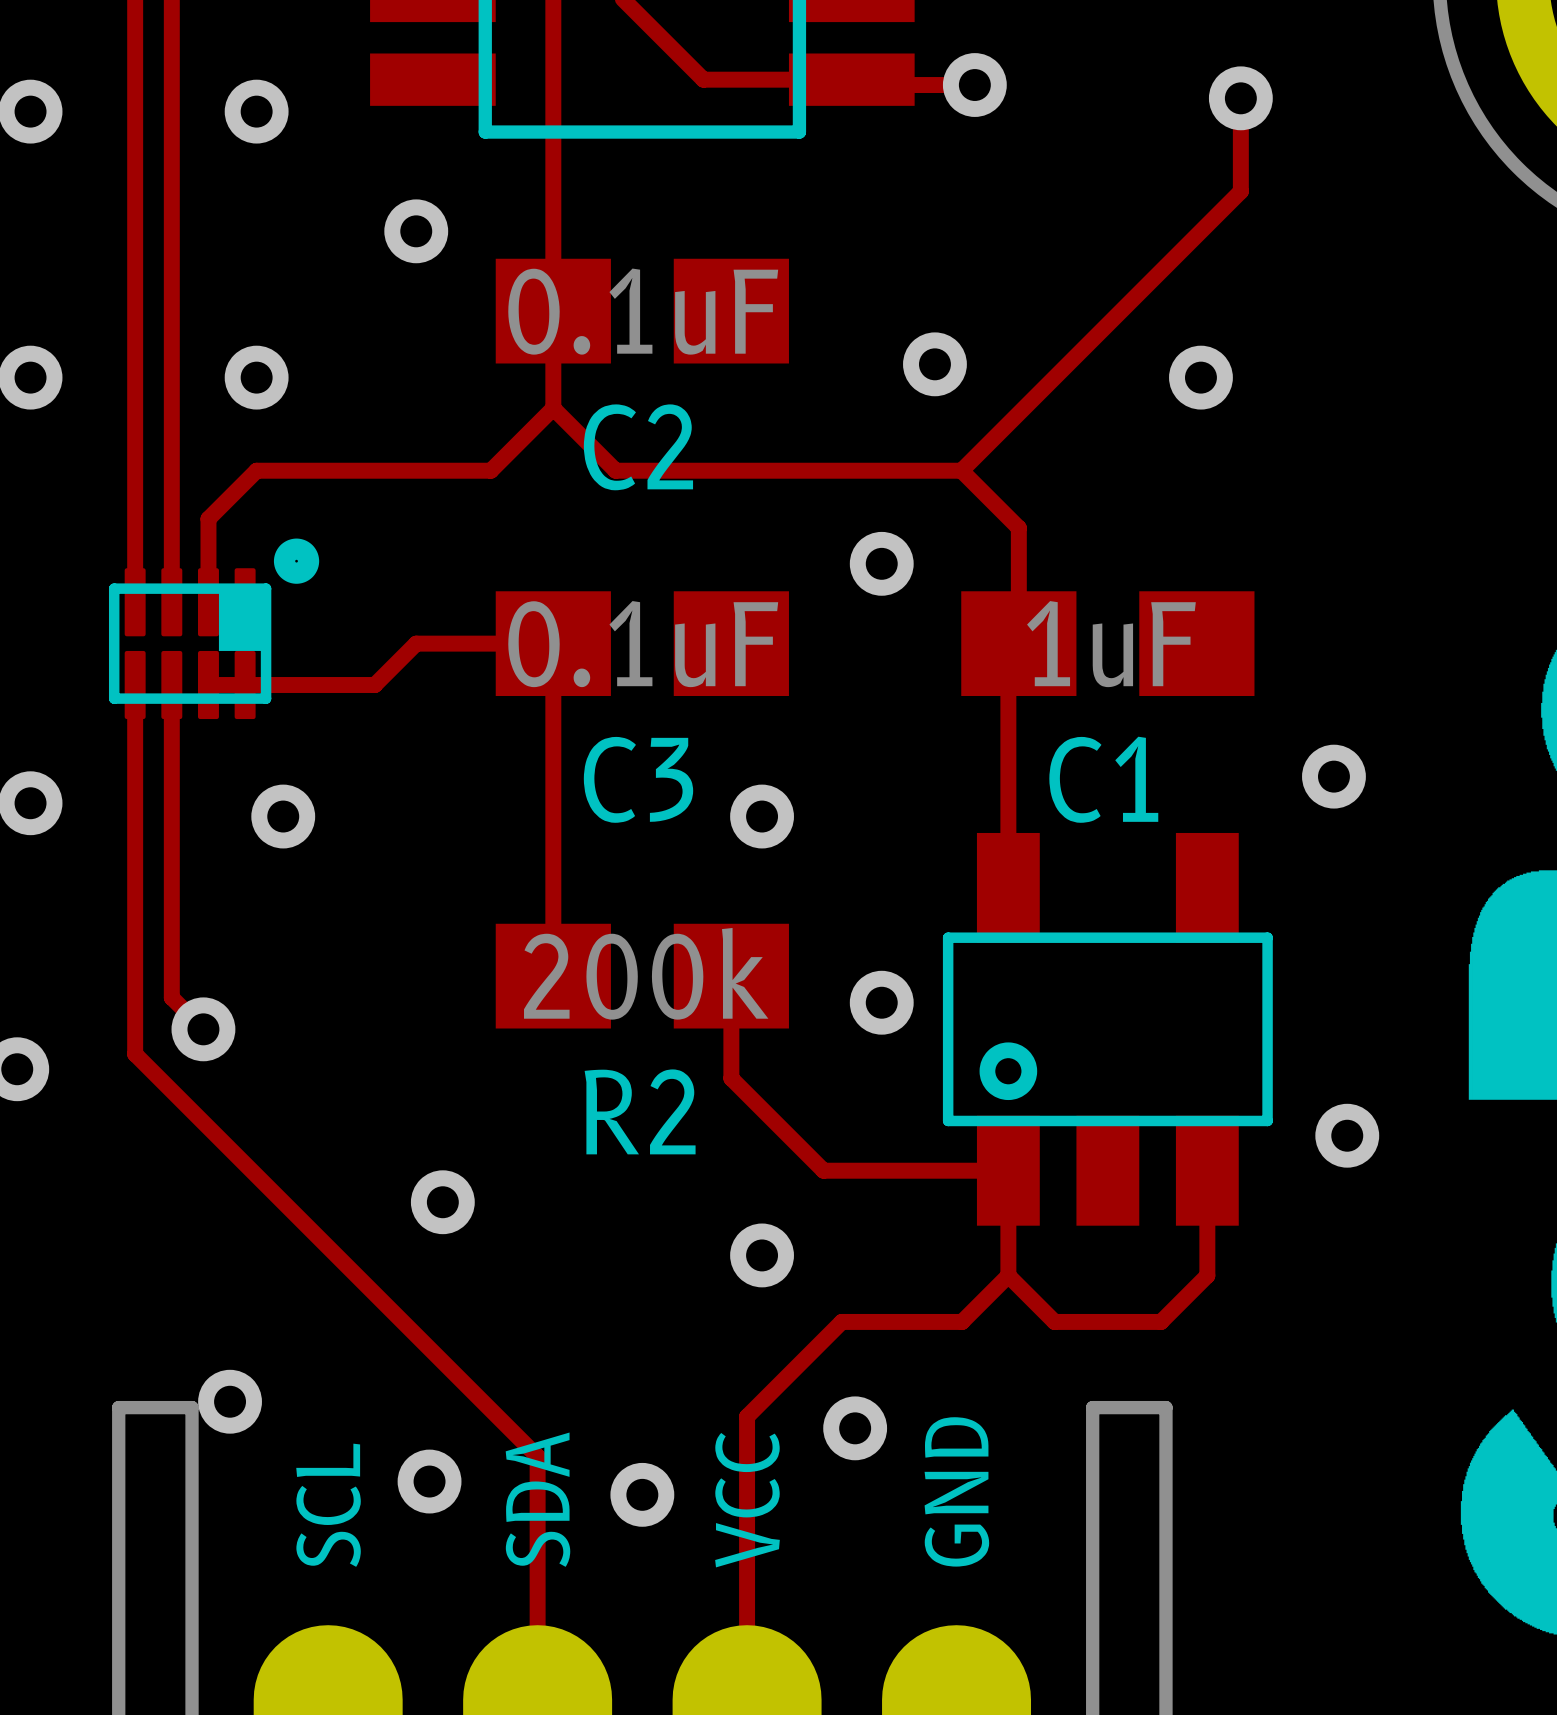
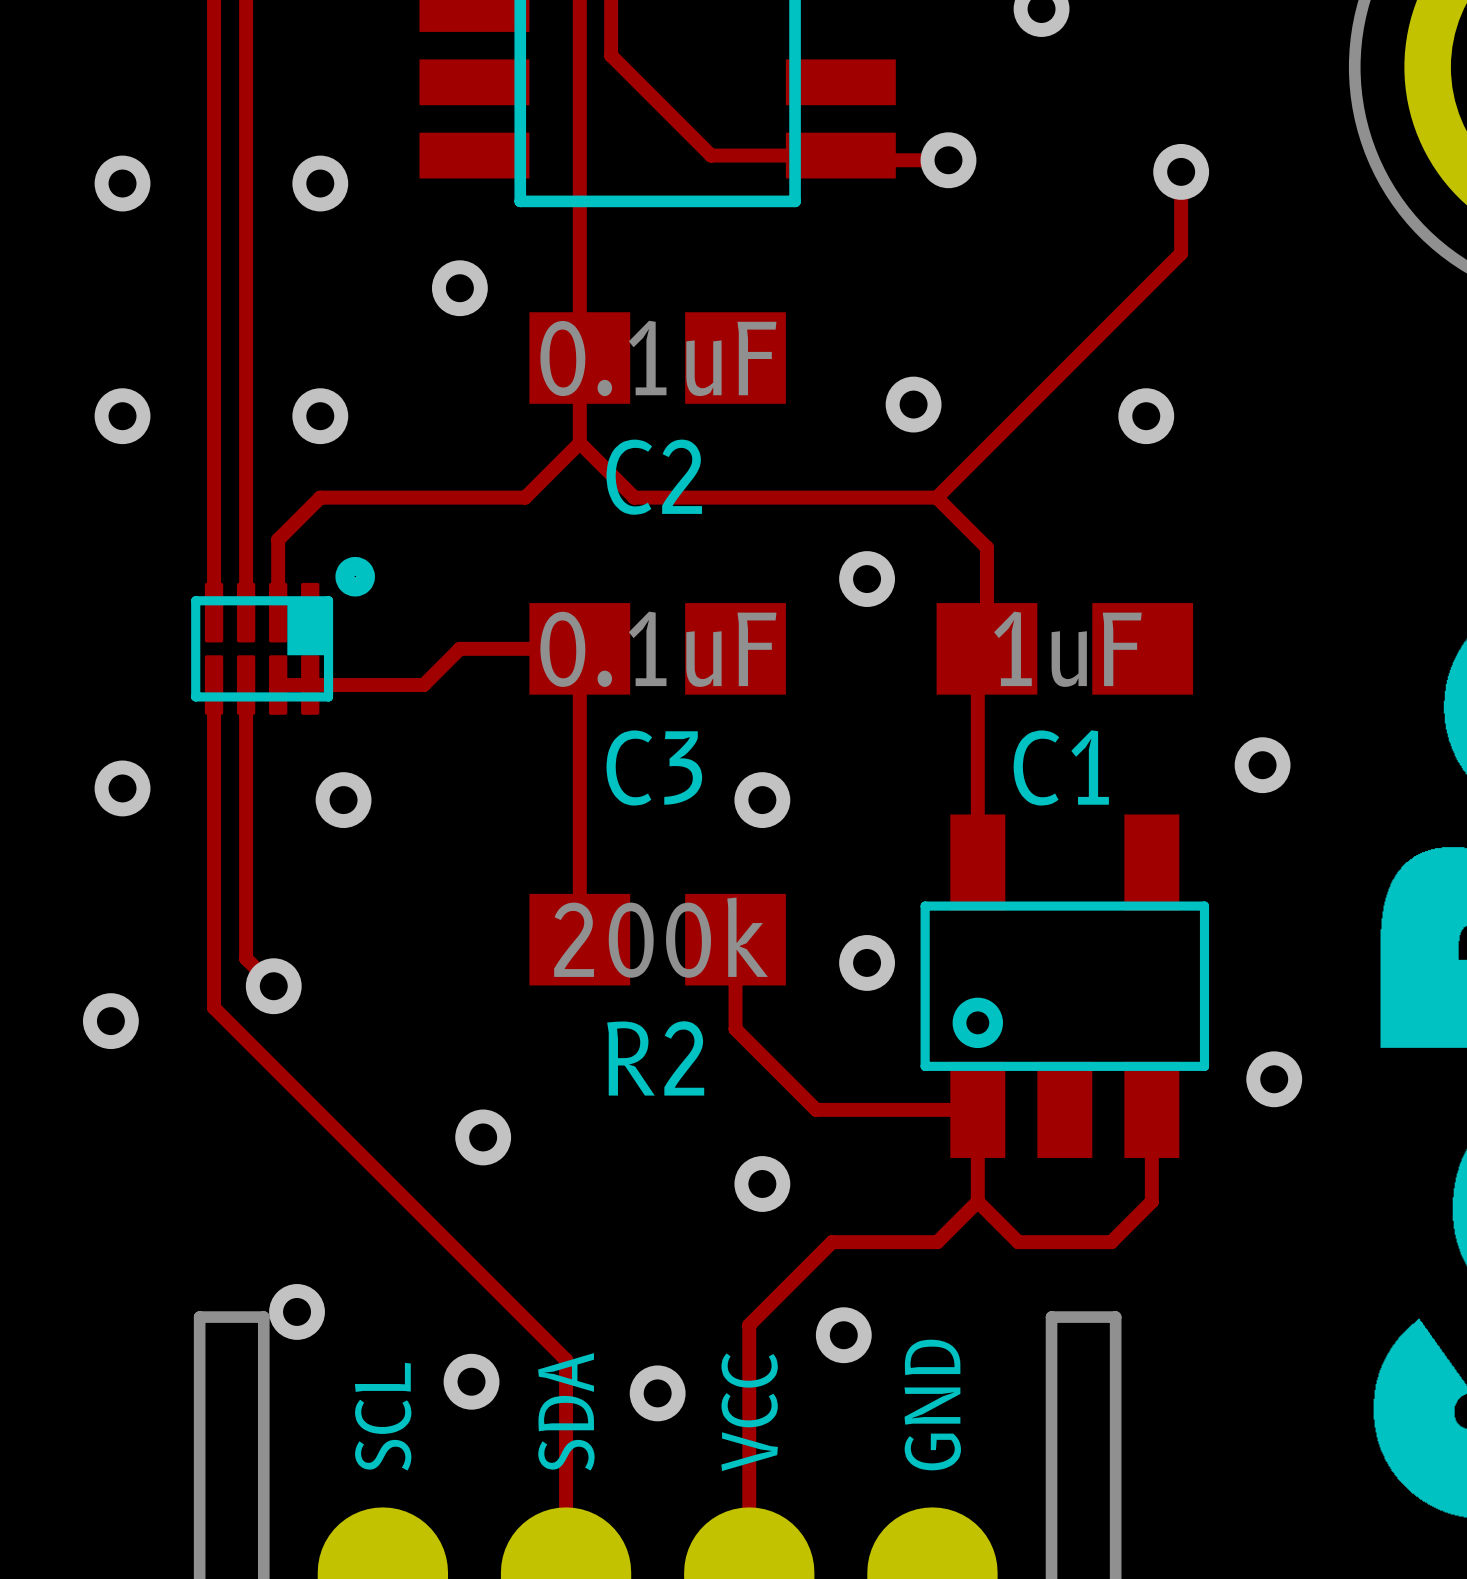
part text position: GND (956, 1491) -> GND (932, 1405)
part text position: SDA (537, 1499) -> SDA (566, 1411)
part text position: VCC (747, 1500) -> VCC (749, 1412)
part text position: SCL (328, 1505) -> SCL (383, 1416)

